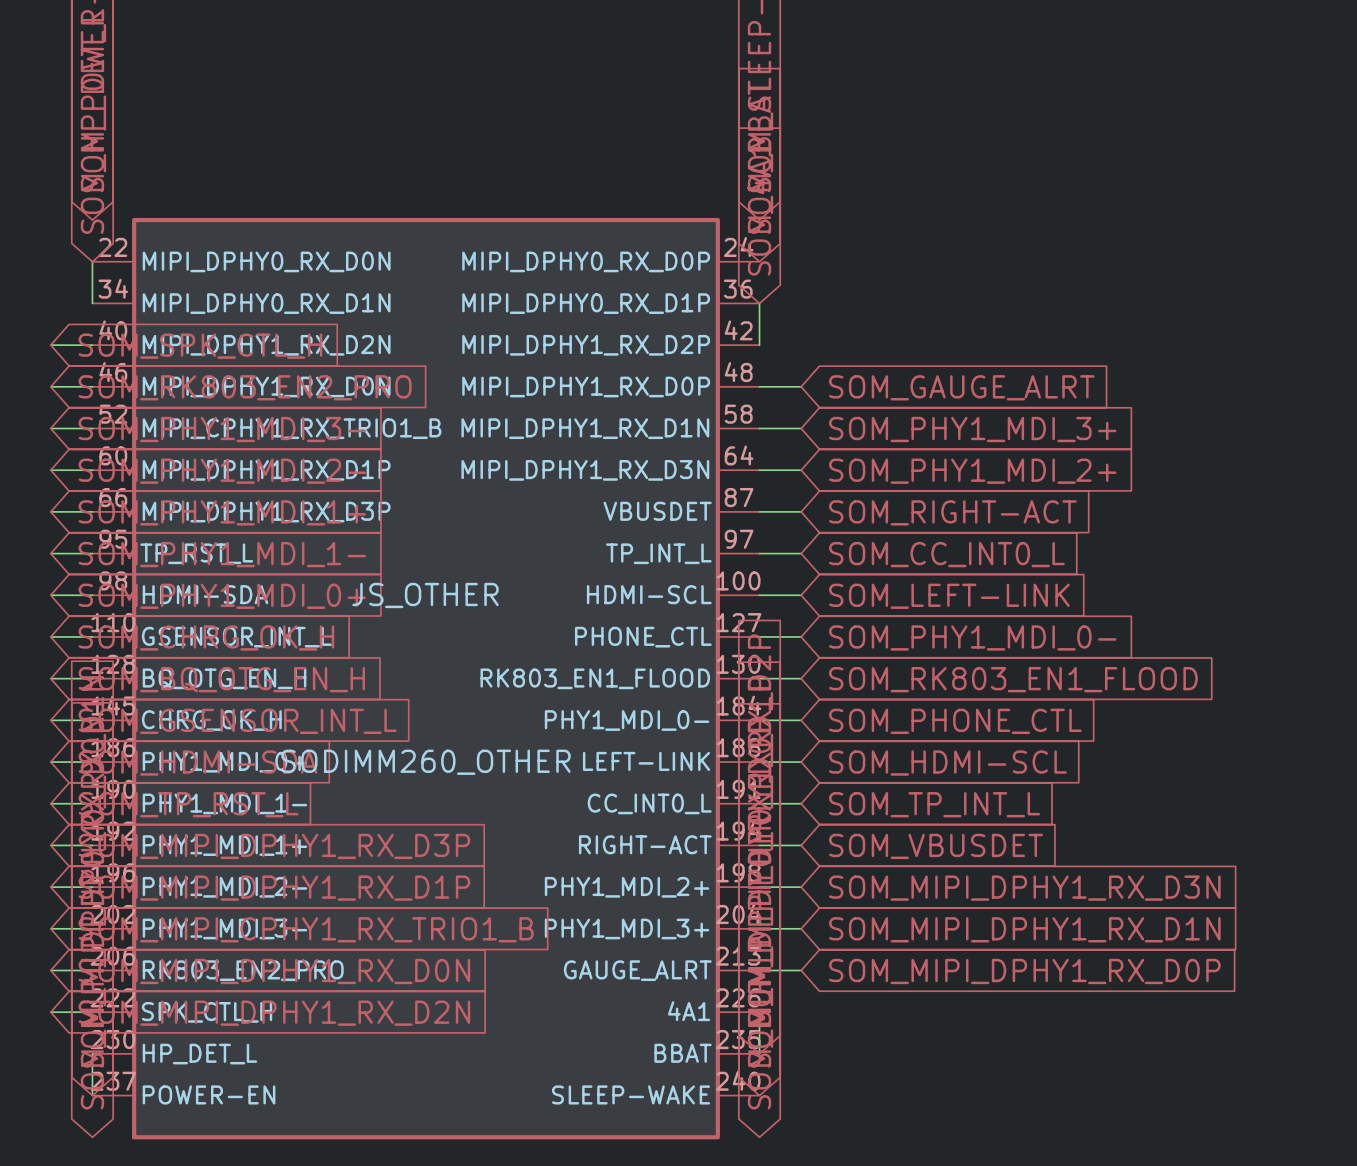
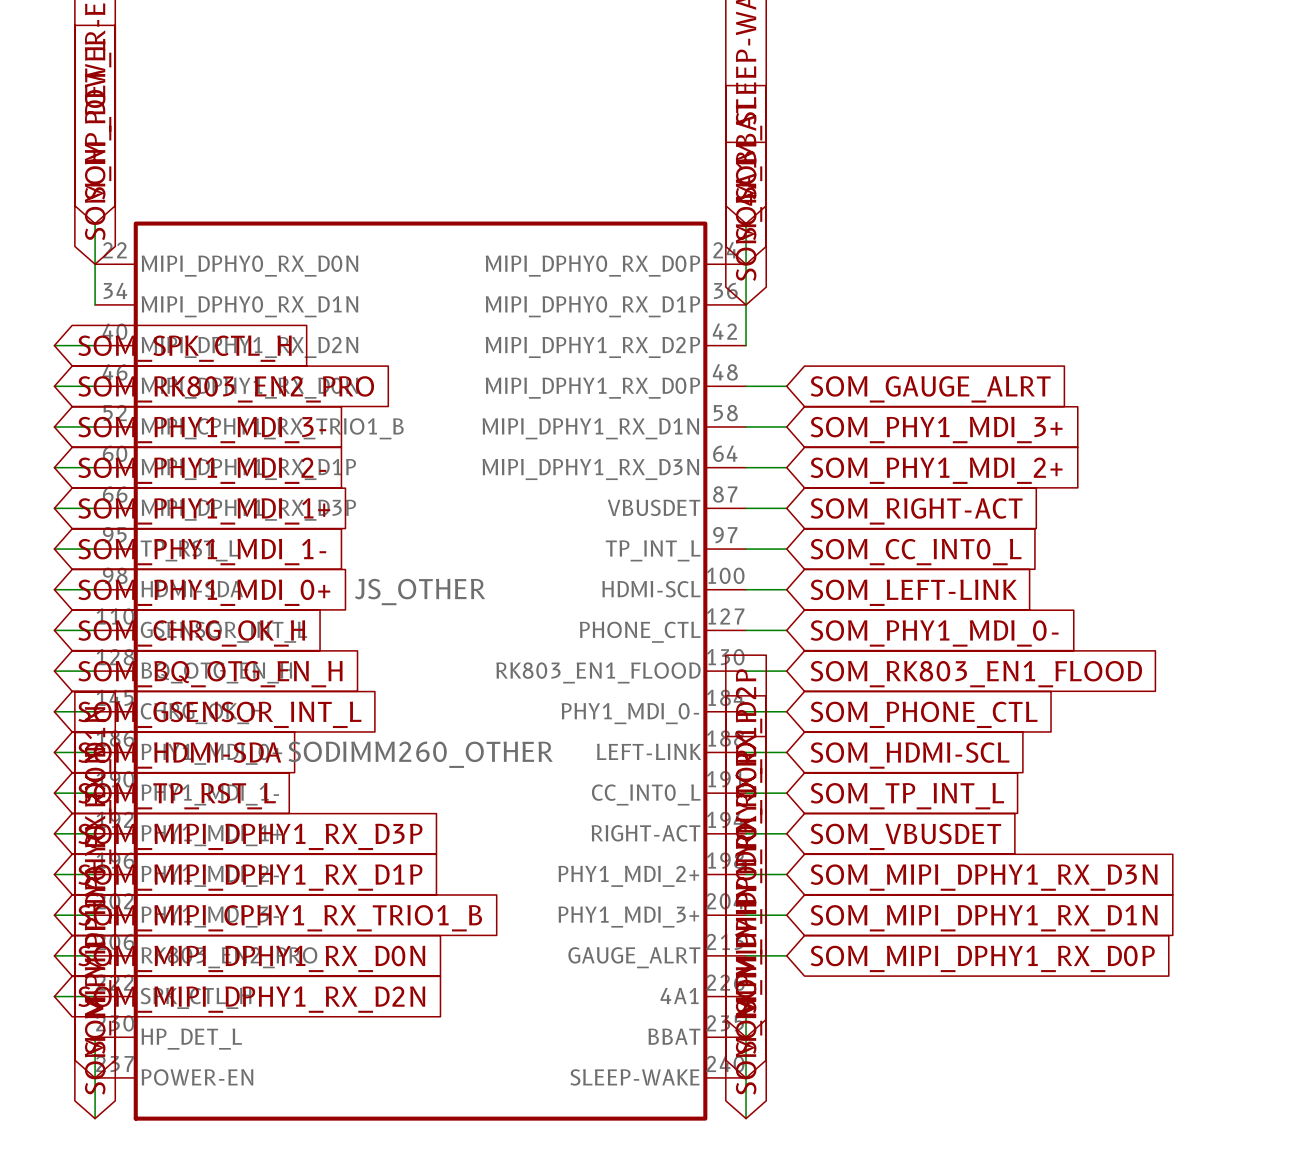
wire: none -> (95, 223) (95, 264)
wire: none -> (746, 223) (746, 304)
wire: none -> (746, 1037) (746, 1118)
wire: none -> (95, 1077) (95, 1118)

